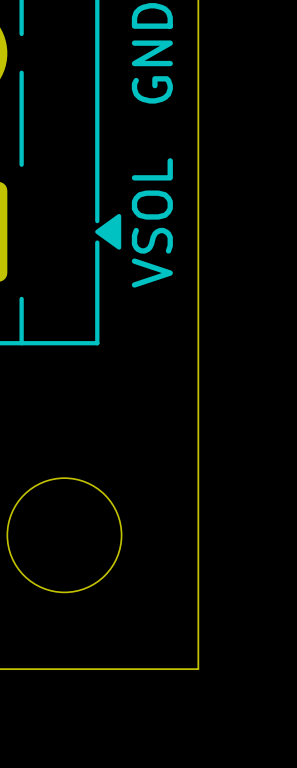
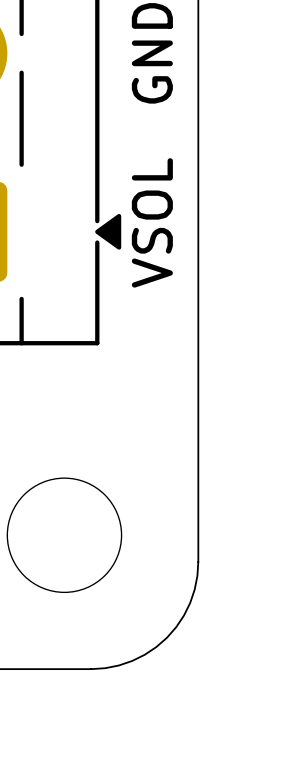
board edge: (198, 562) (198, 669) (91, 669) -> (198, 562) (194, 589) (190, 603) (176, 627) (166, 637) (156, 646) (132, 660) (118, 665) (91, 669)

